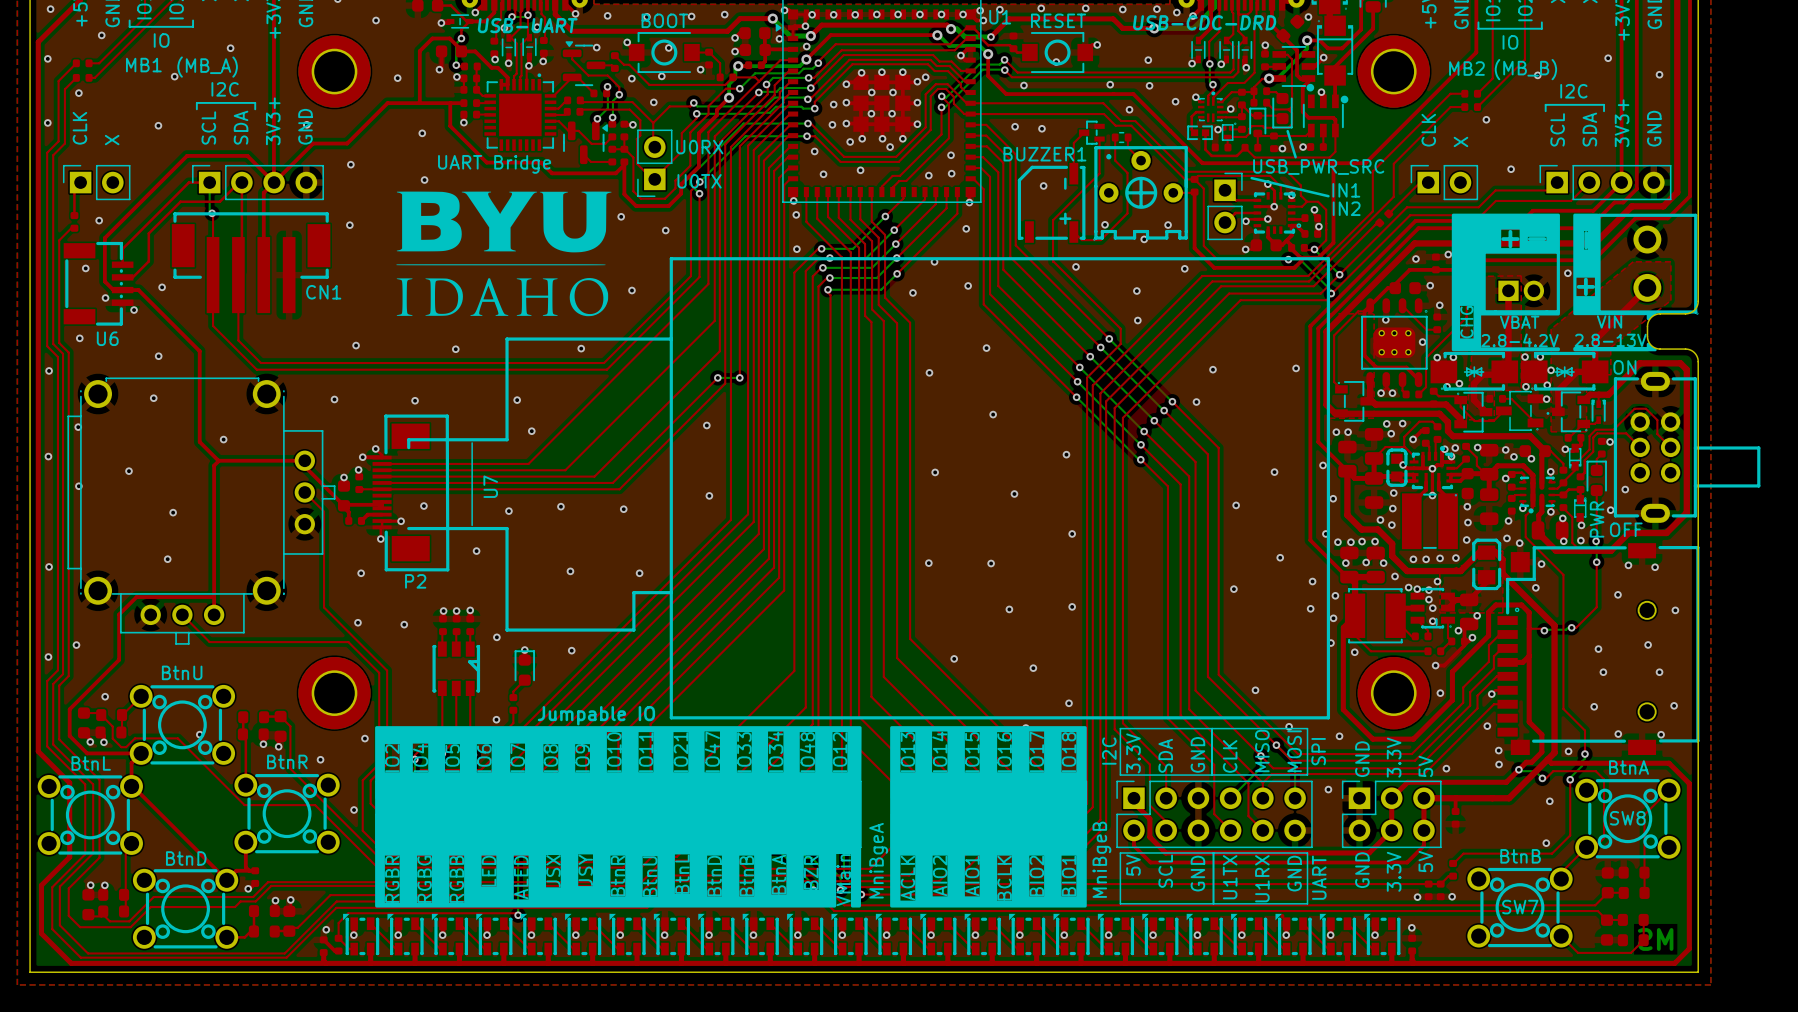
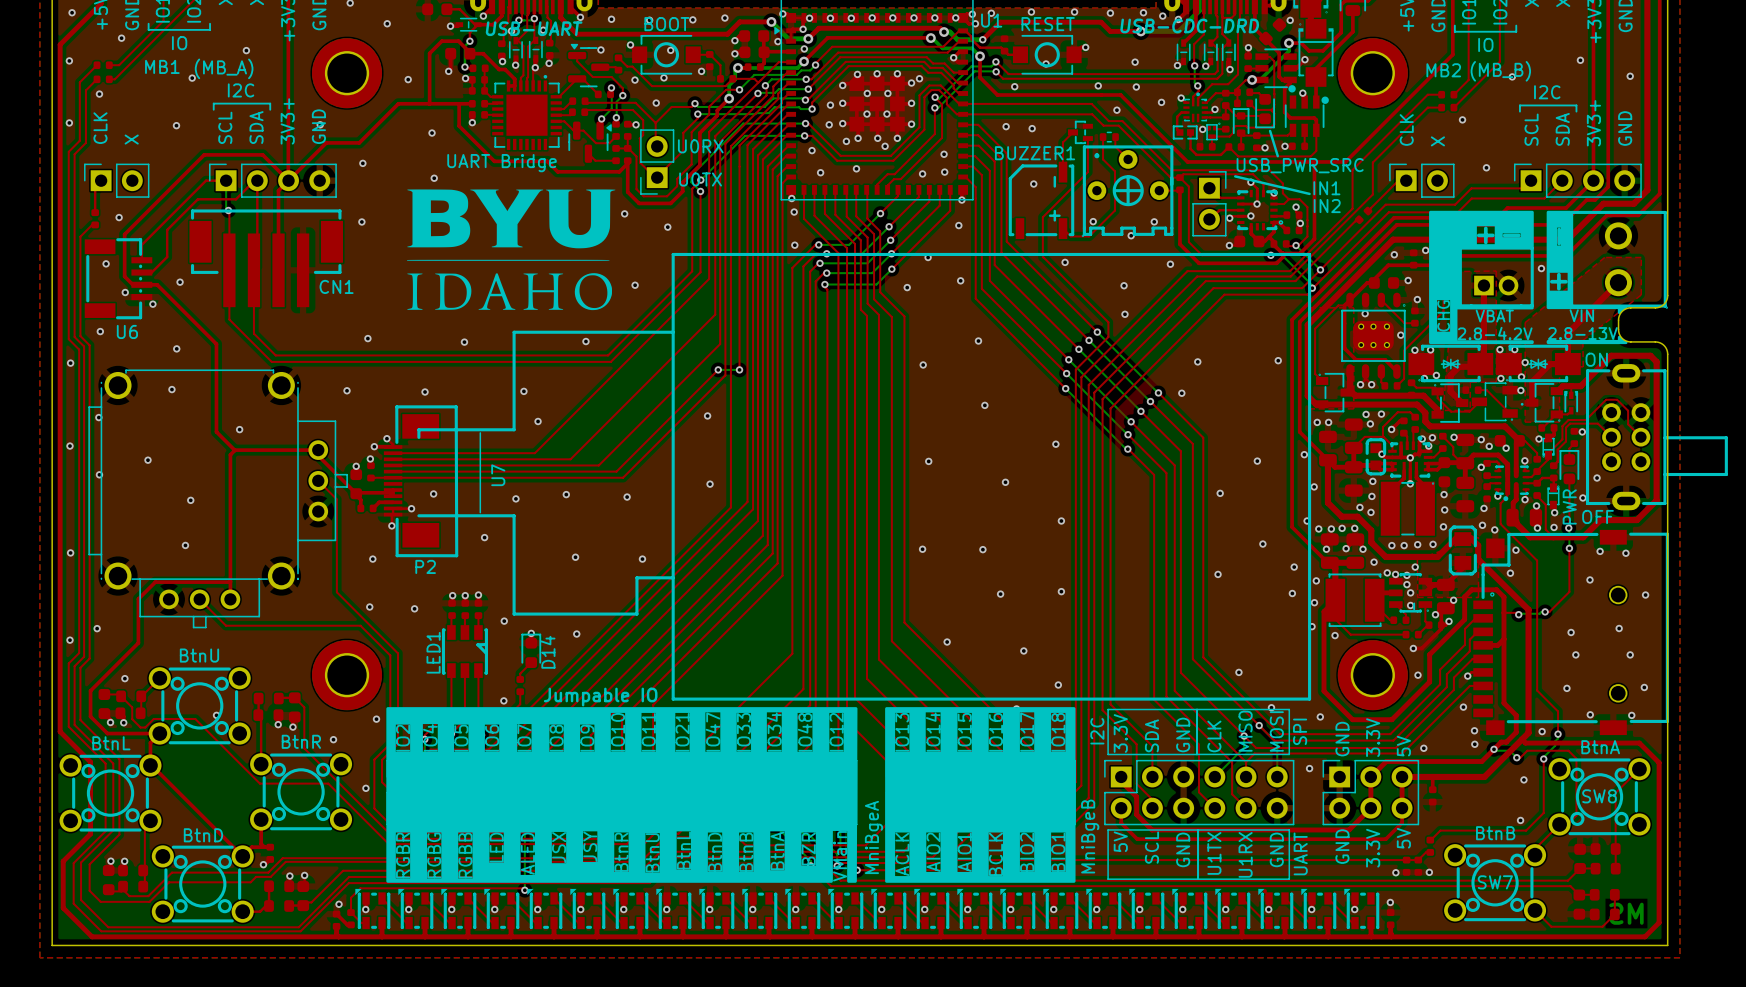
D14 name: none -> D14 (548, 652)
LED1 name: none -> LED1 (433, 652)

